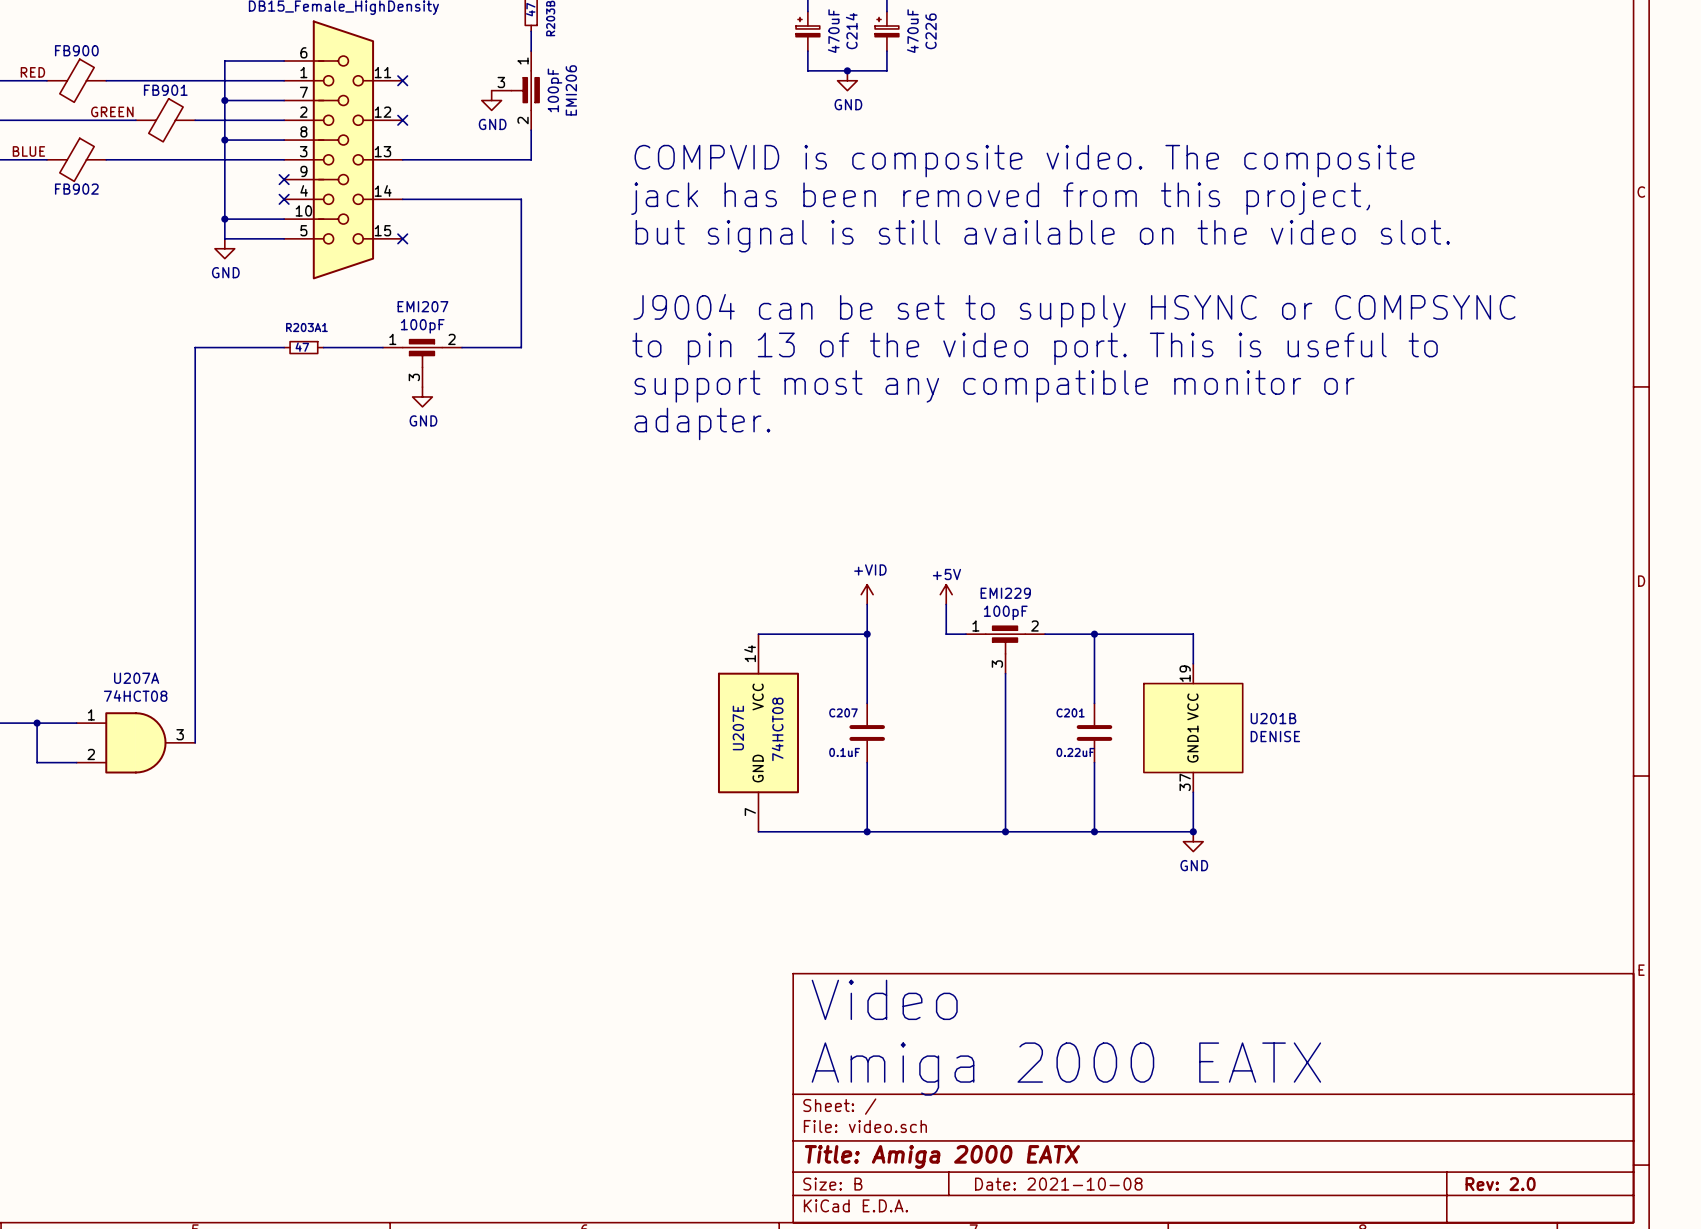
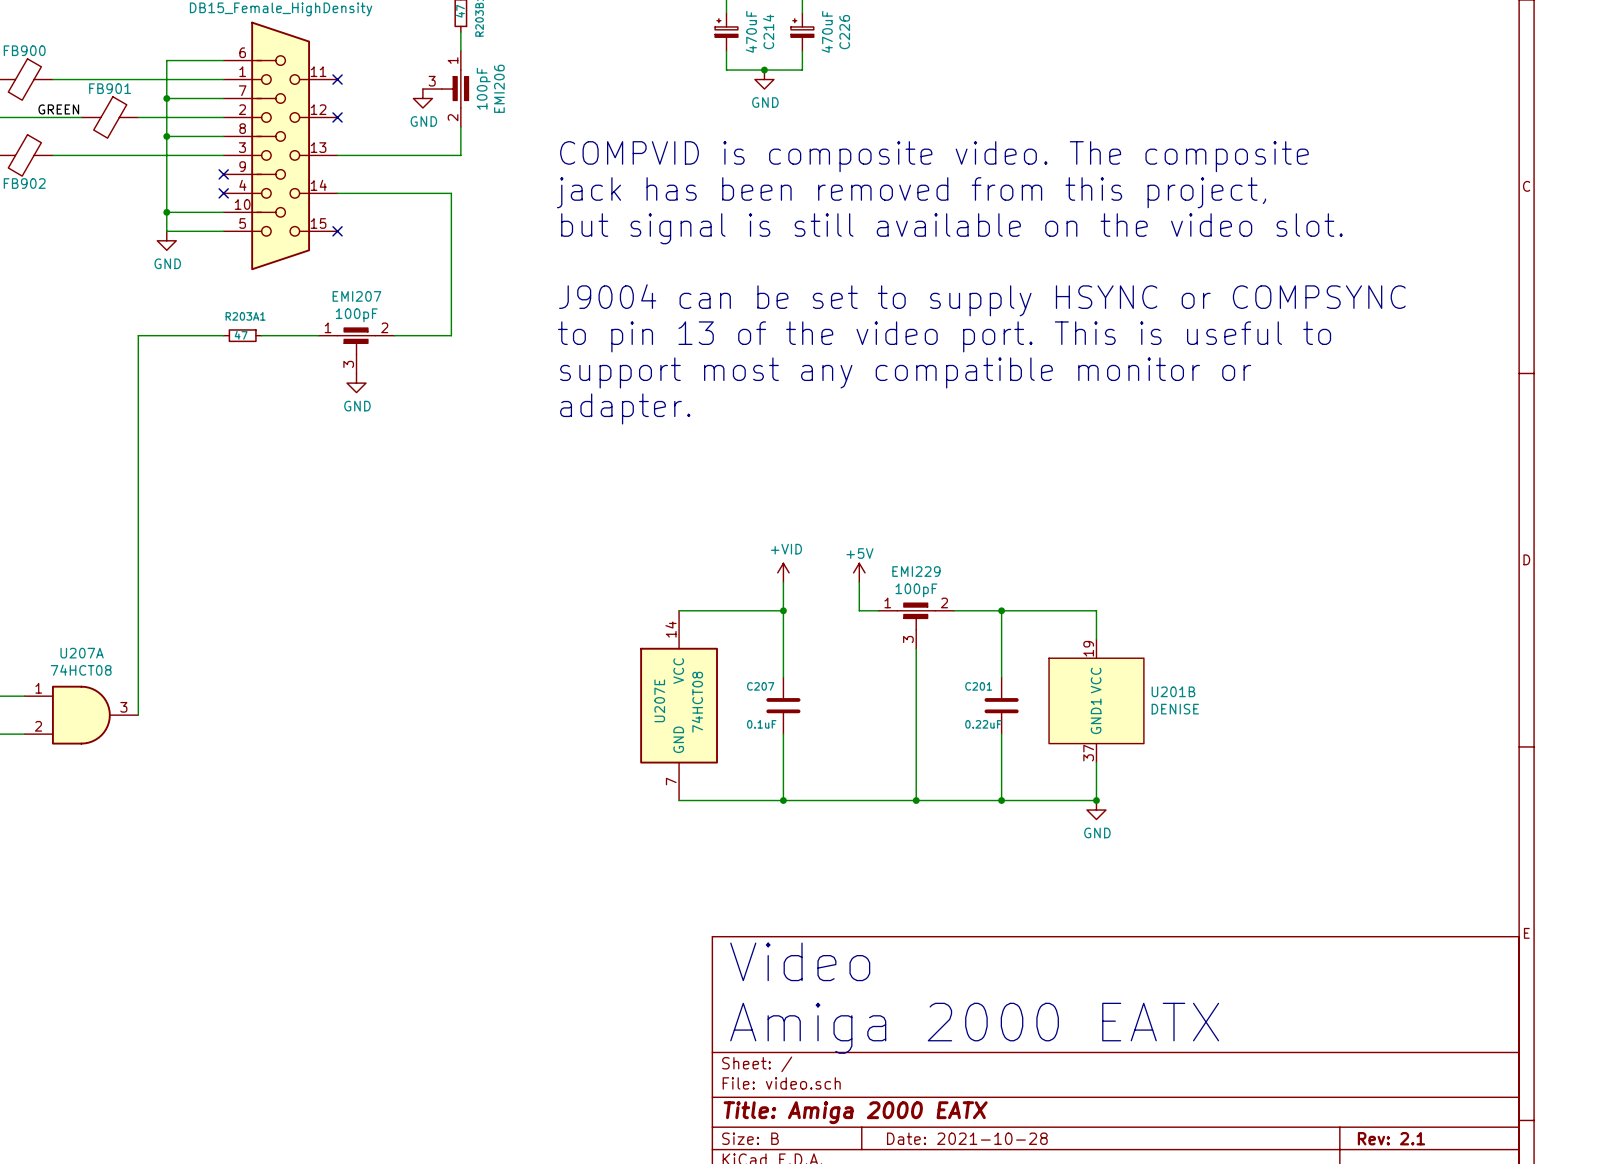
title block: Date: 2021-10-08 (1058, 1184) -> Date: 2021-10-28 (967, 1138)
title block: Rev: 2.0 (1500, 1184) -> Rev: 2.1 (1391, 1138)

